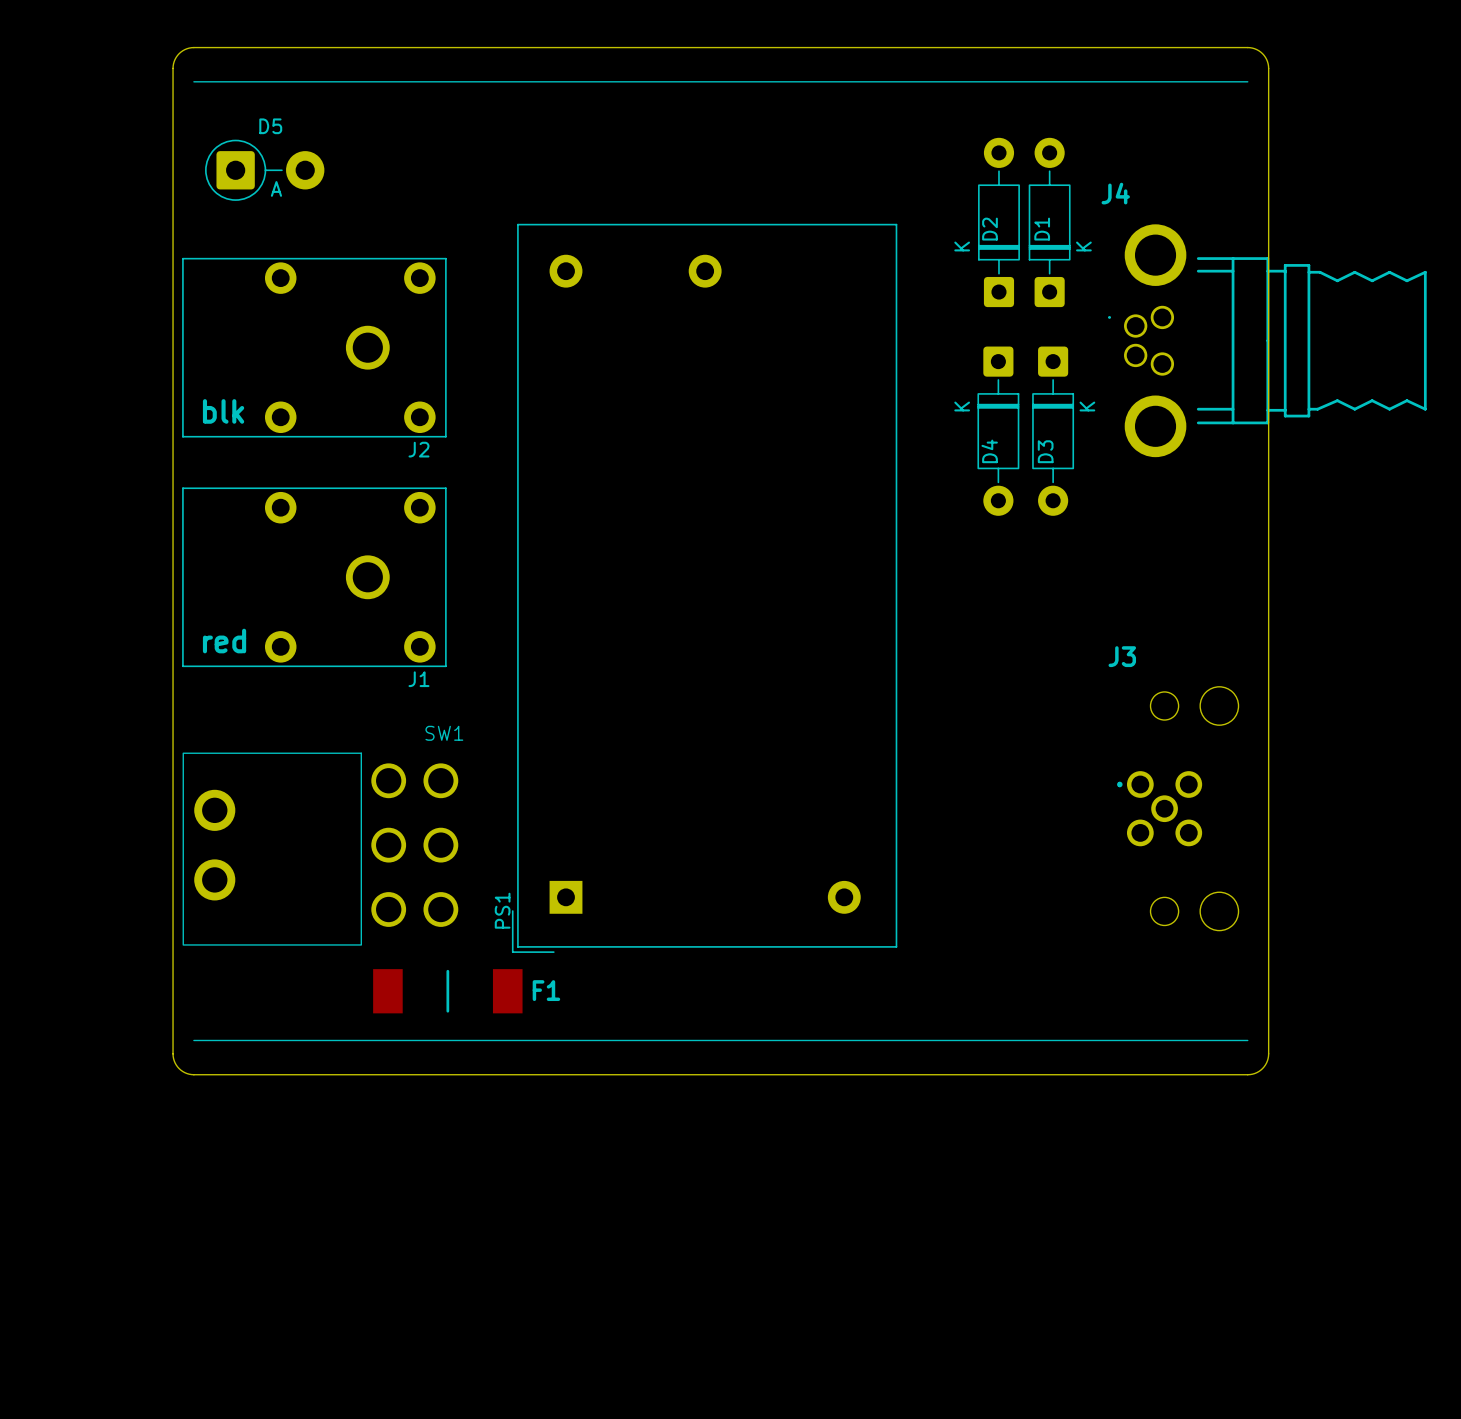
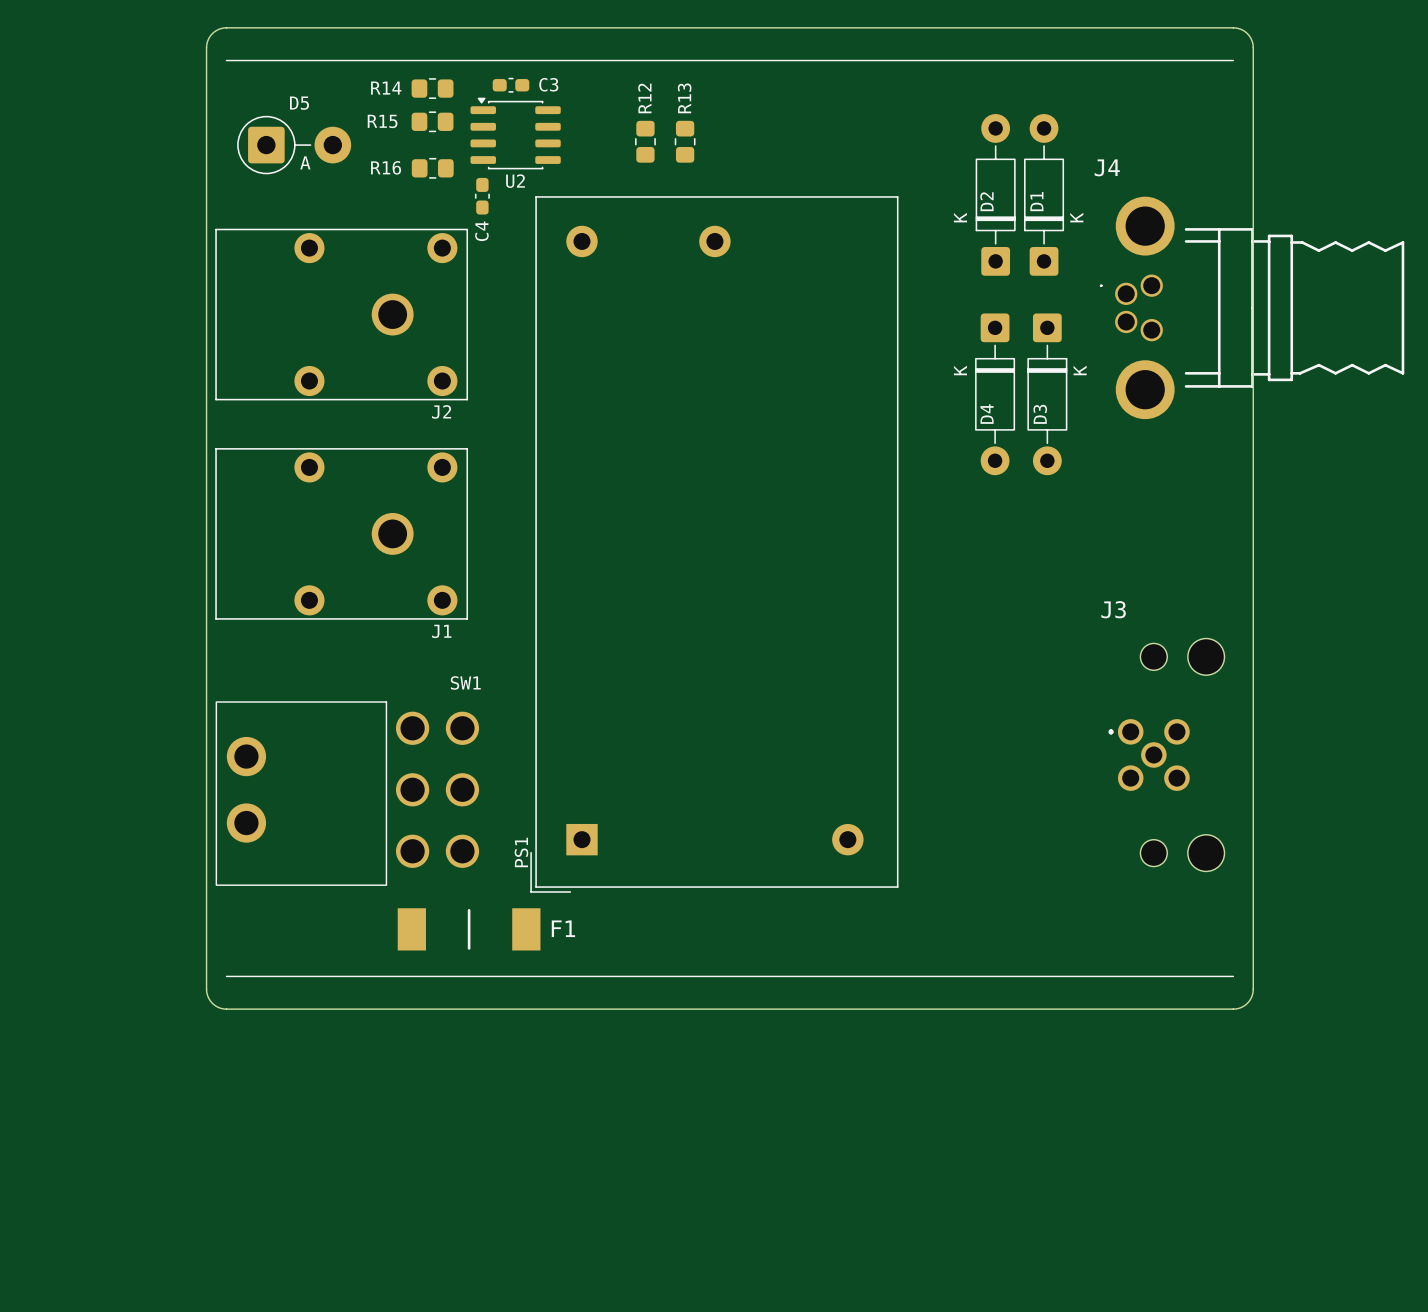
C3: none -> (510, 85)
R14: none -> (432, 88)
R15: none -> (432, 121)
U2: none -> (515, 133)
R12: none -> (645, 141)
R13: none -> (685, 141)
R16: none -> (432, 168)
C4: none -> (482, 196)
text: blk (223, 411) -> none
text: red (224, 641) -> none

